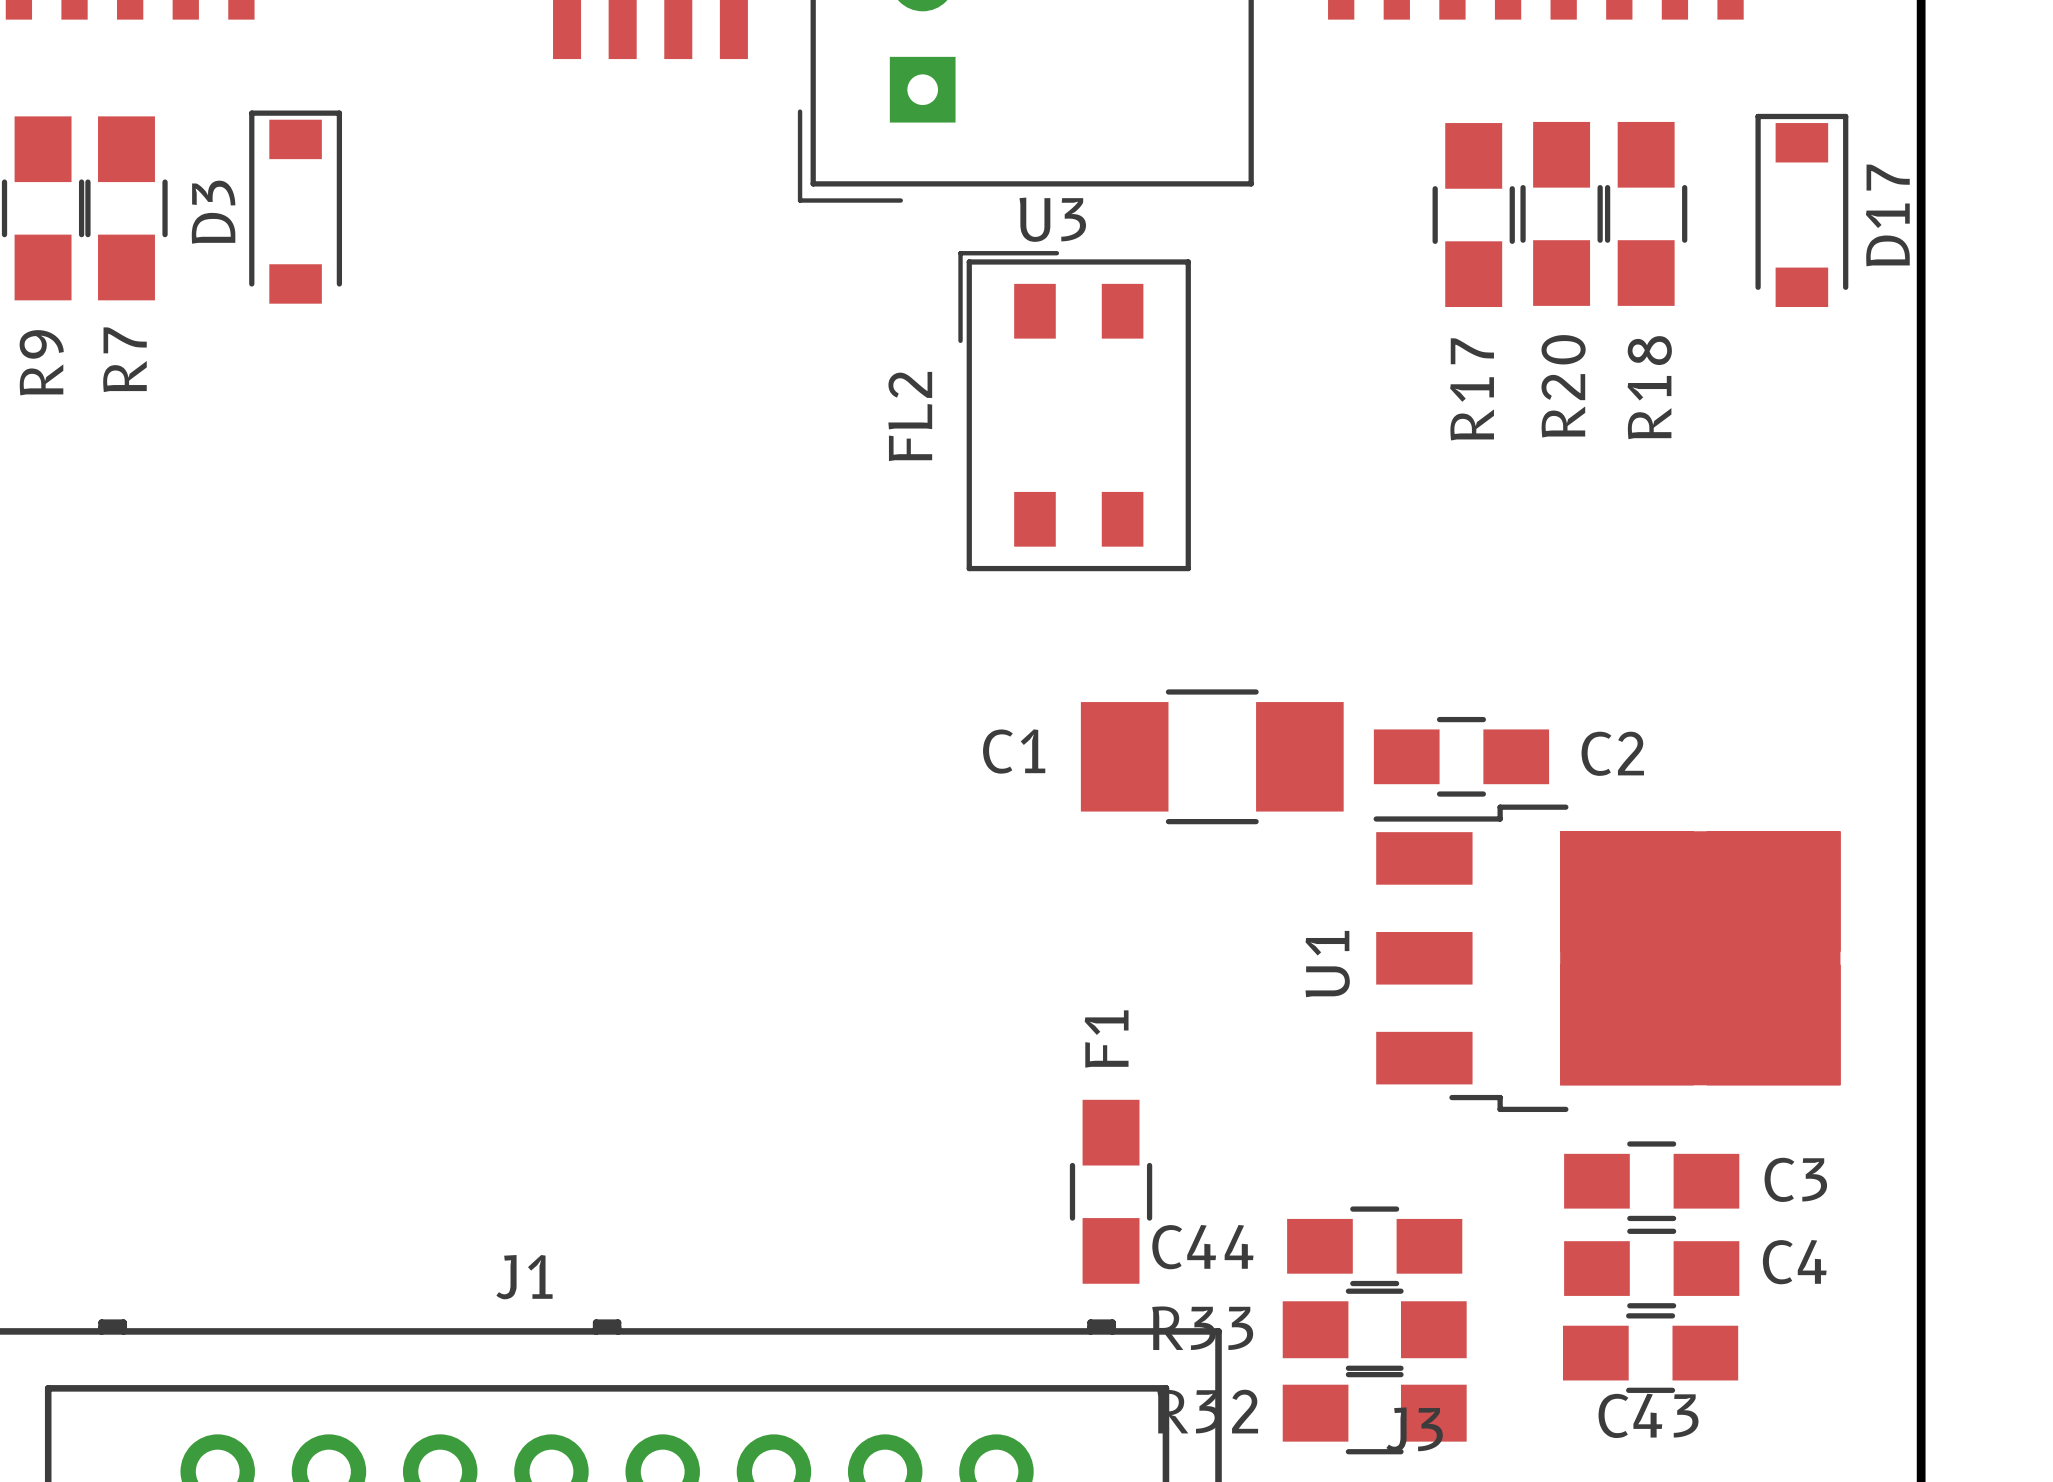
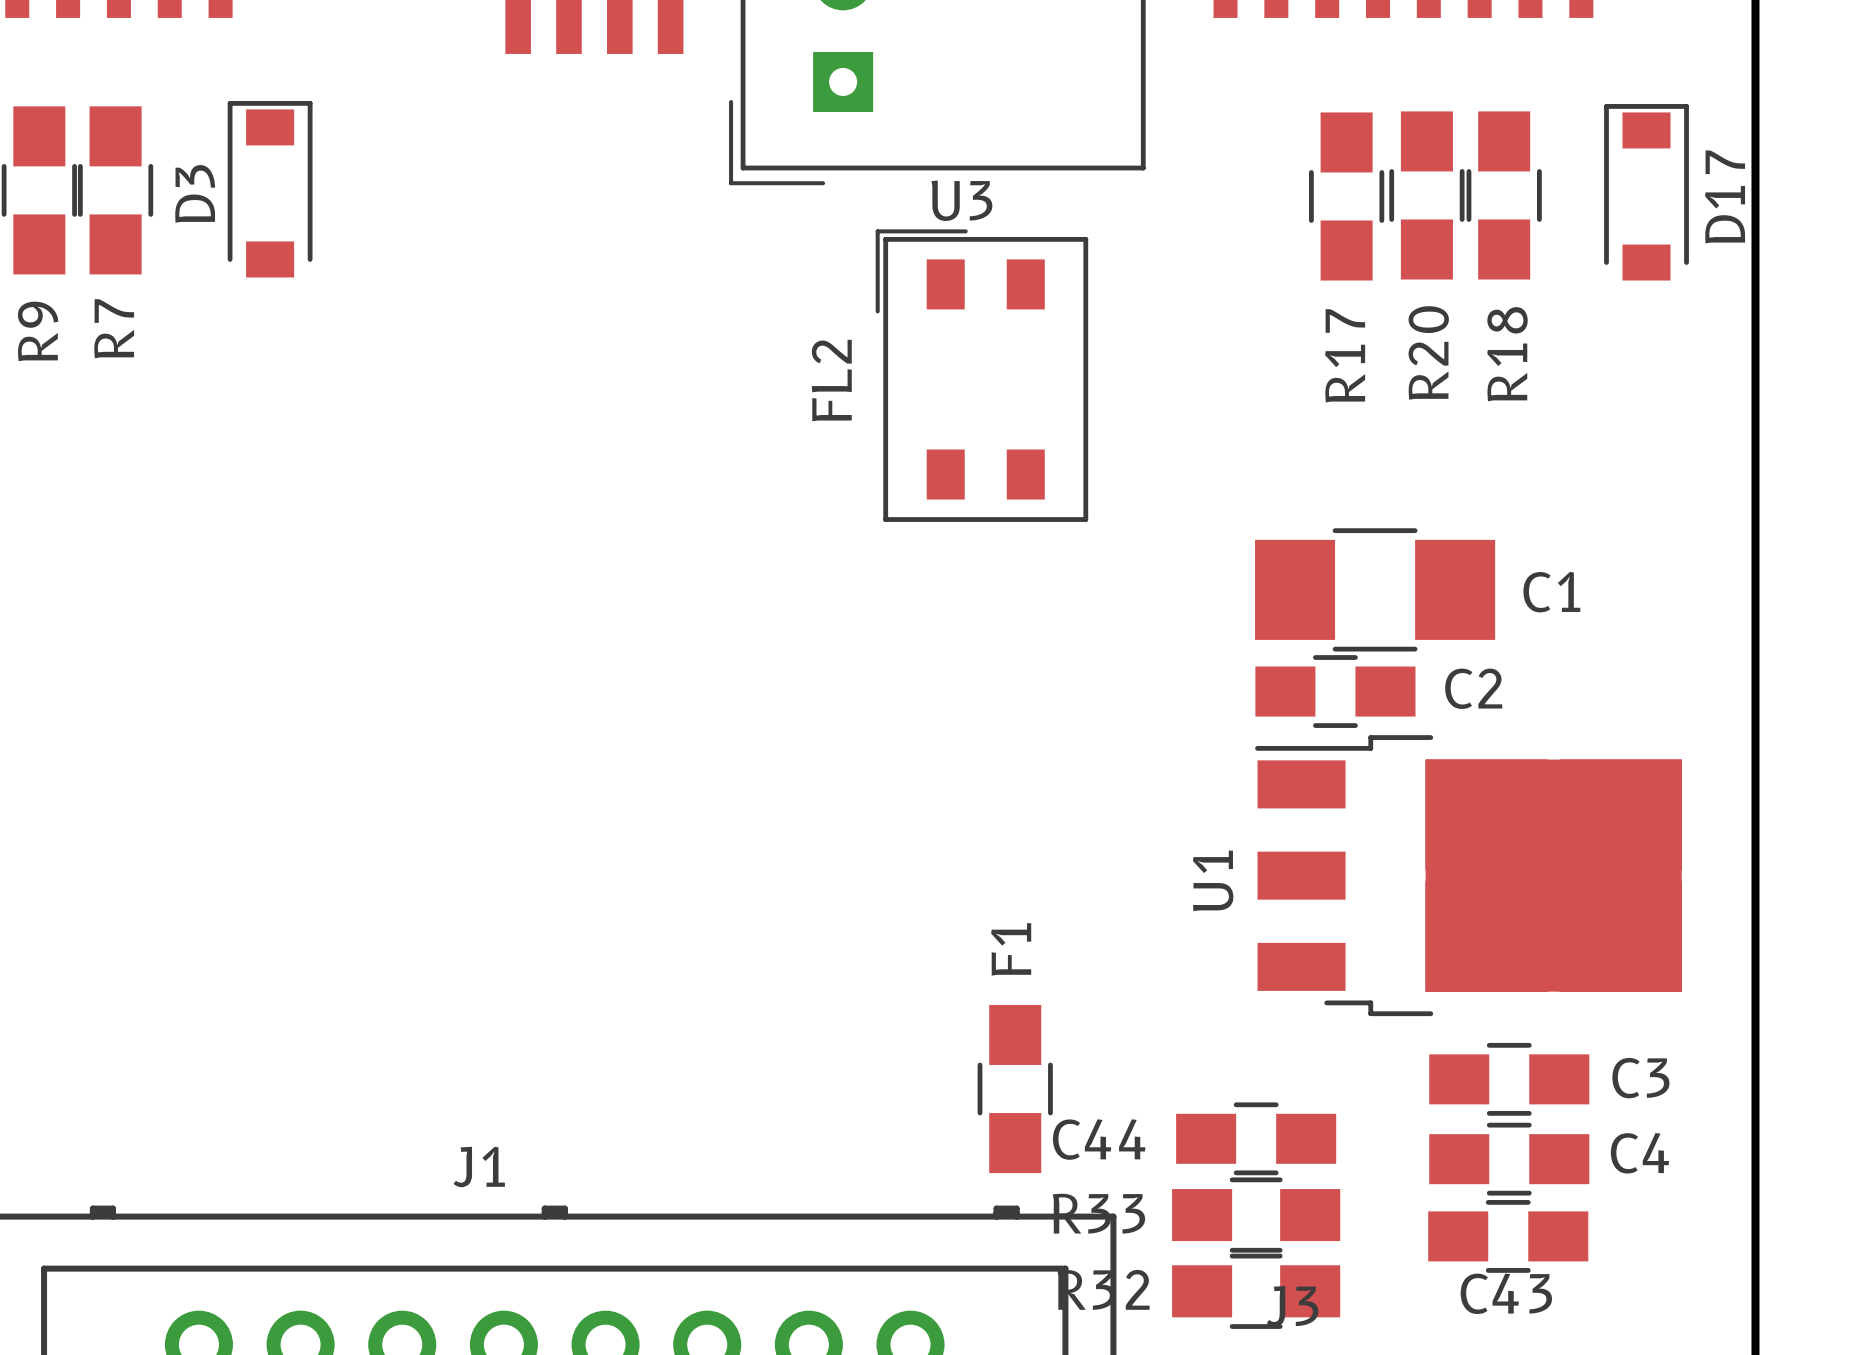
C1 name position: C1 (1014, 751) -> C1 (1551, 592)
C1 position: (1212, 756) -> (1375, 589)

